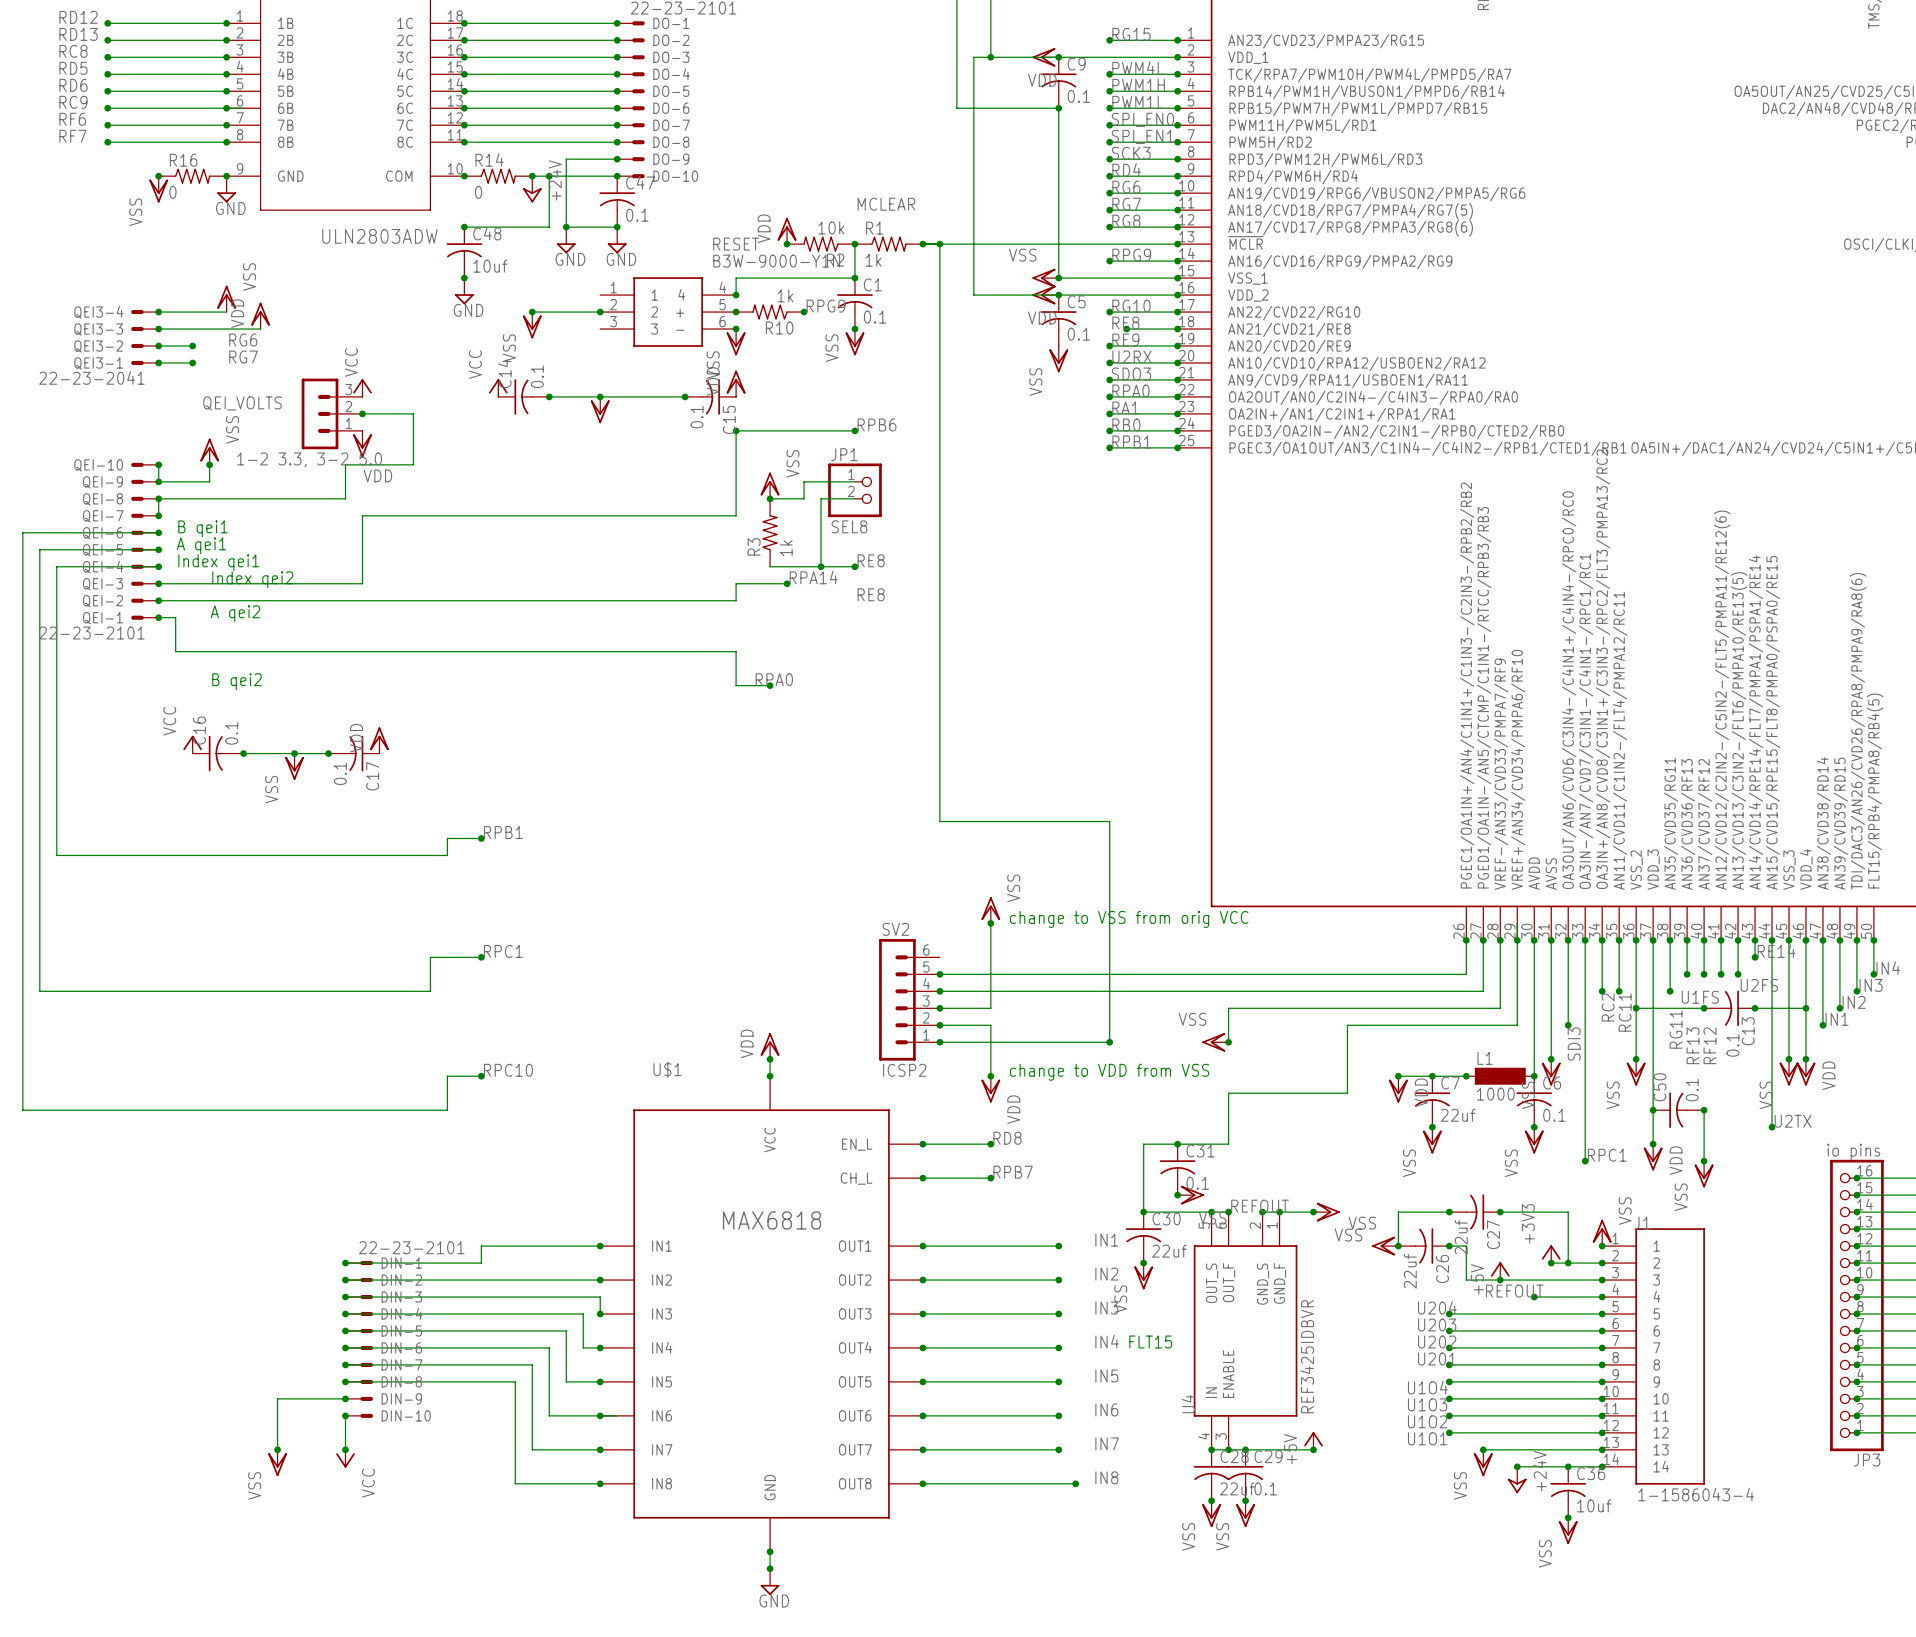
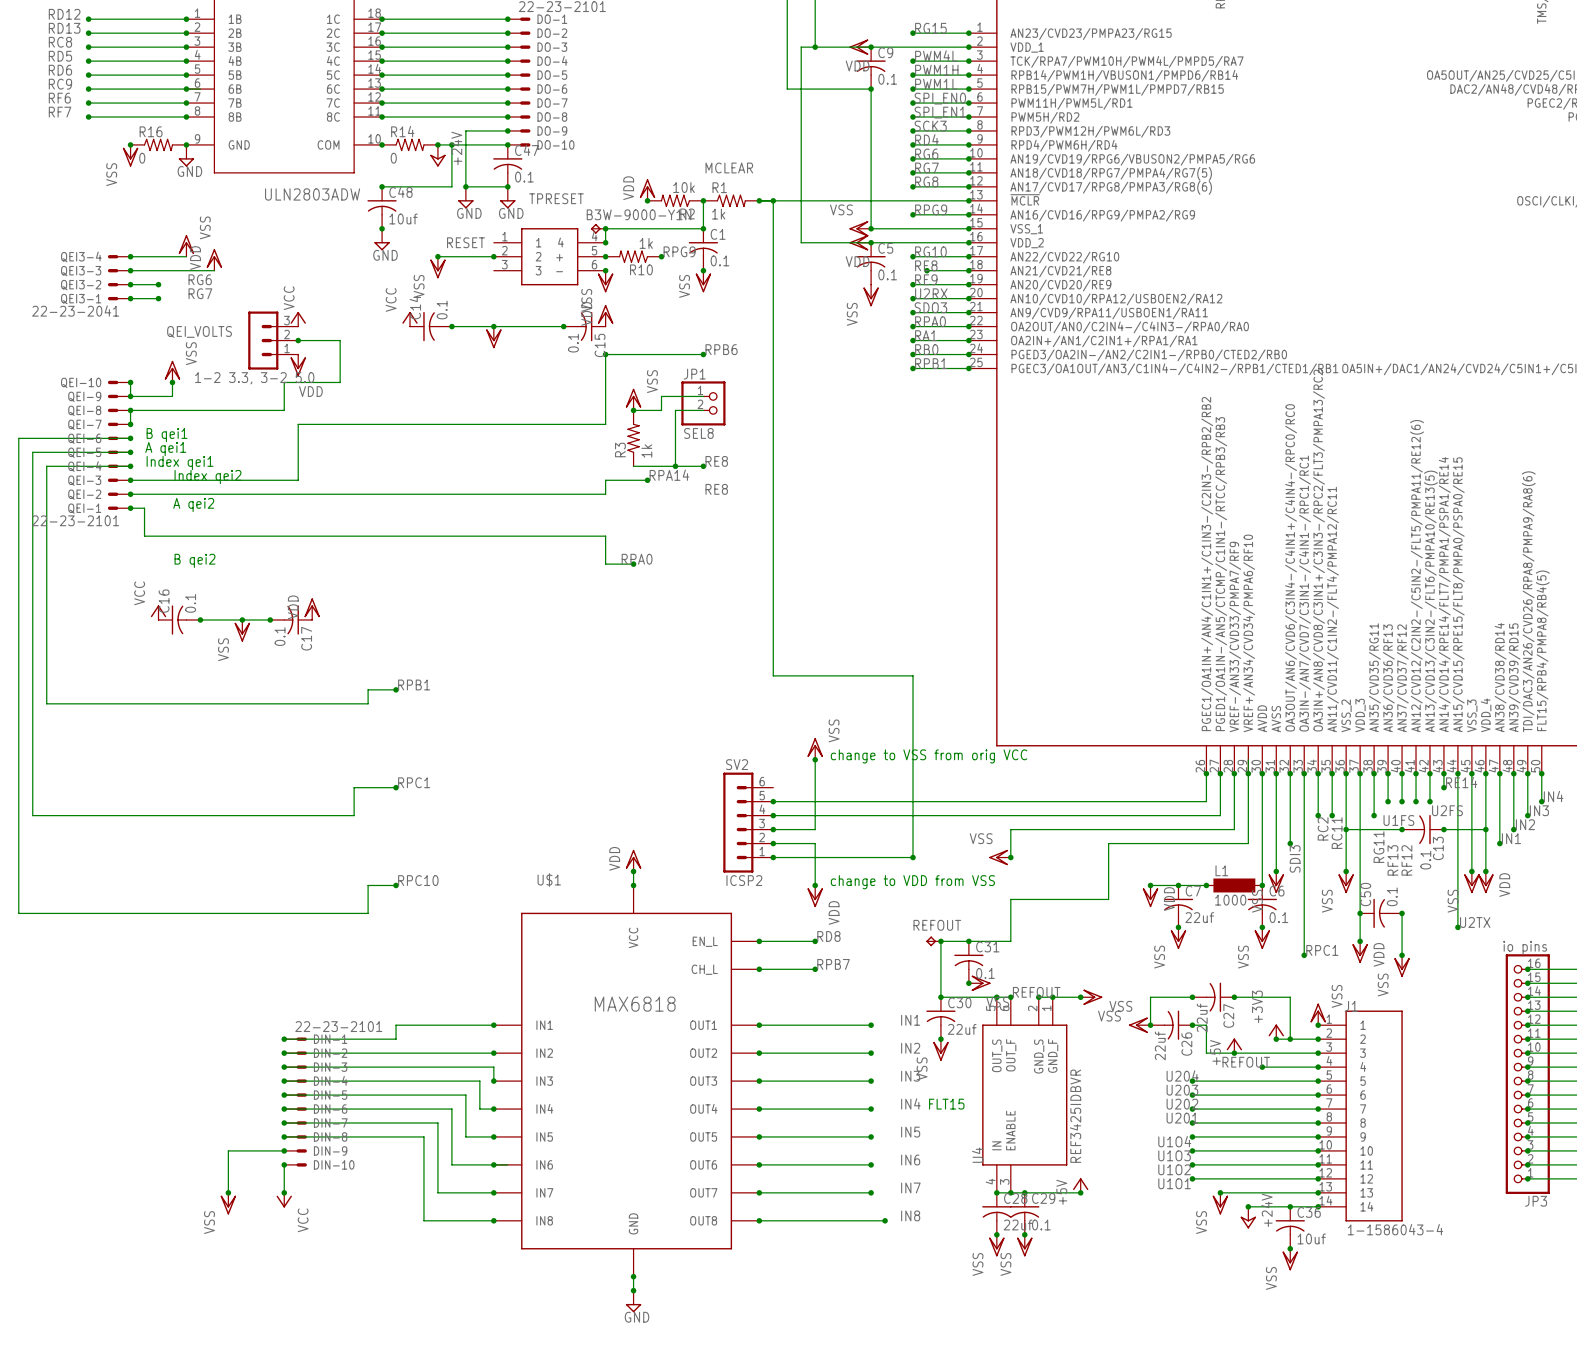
RESET name position: RESET (736, 244) -> RESET (465, 242)
TPRESET: none -> (598, 228)
junction: none -> (605, 228)
REFOUT: none -> (933, 941)
junction: none -> (940, 941)

